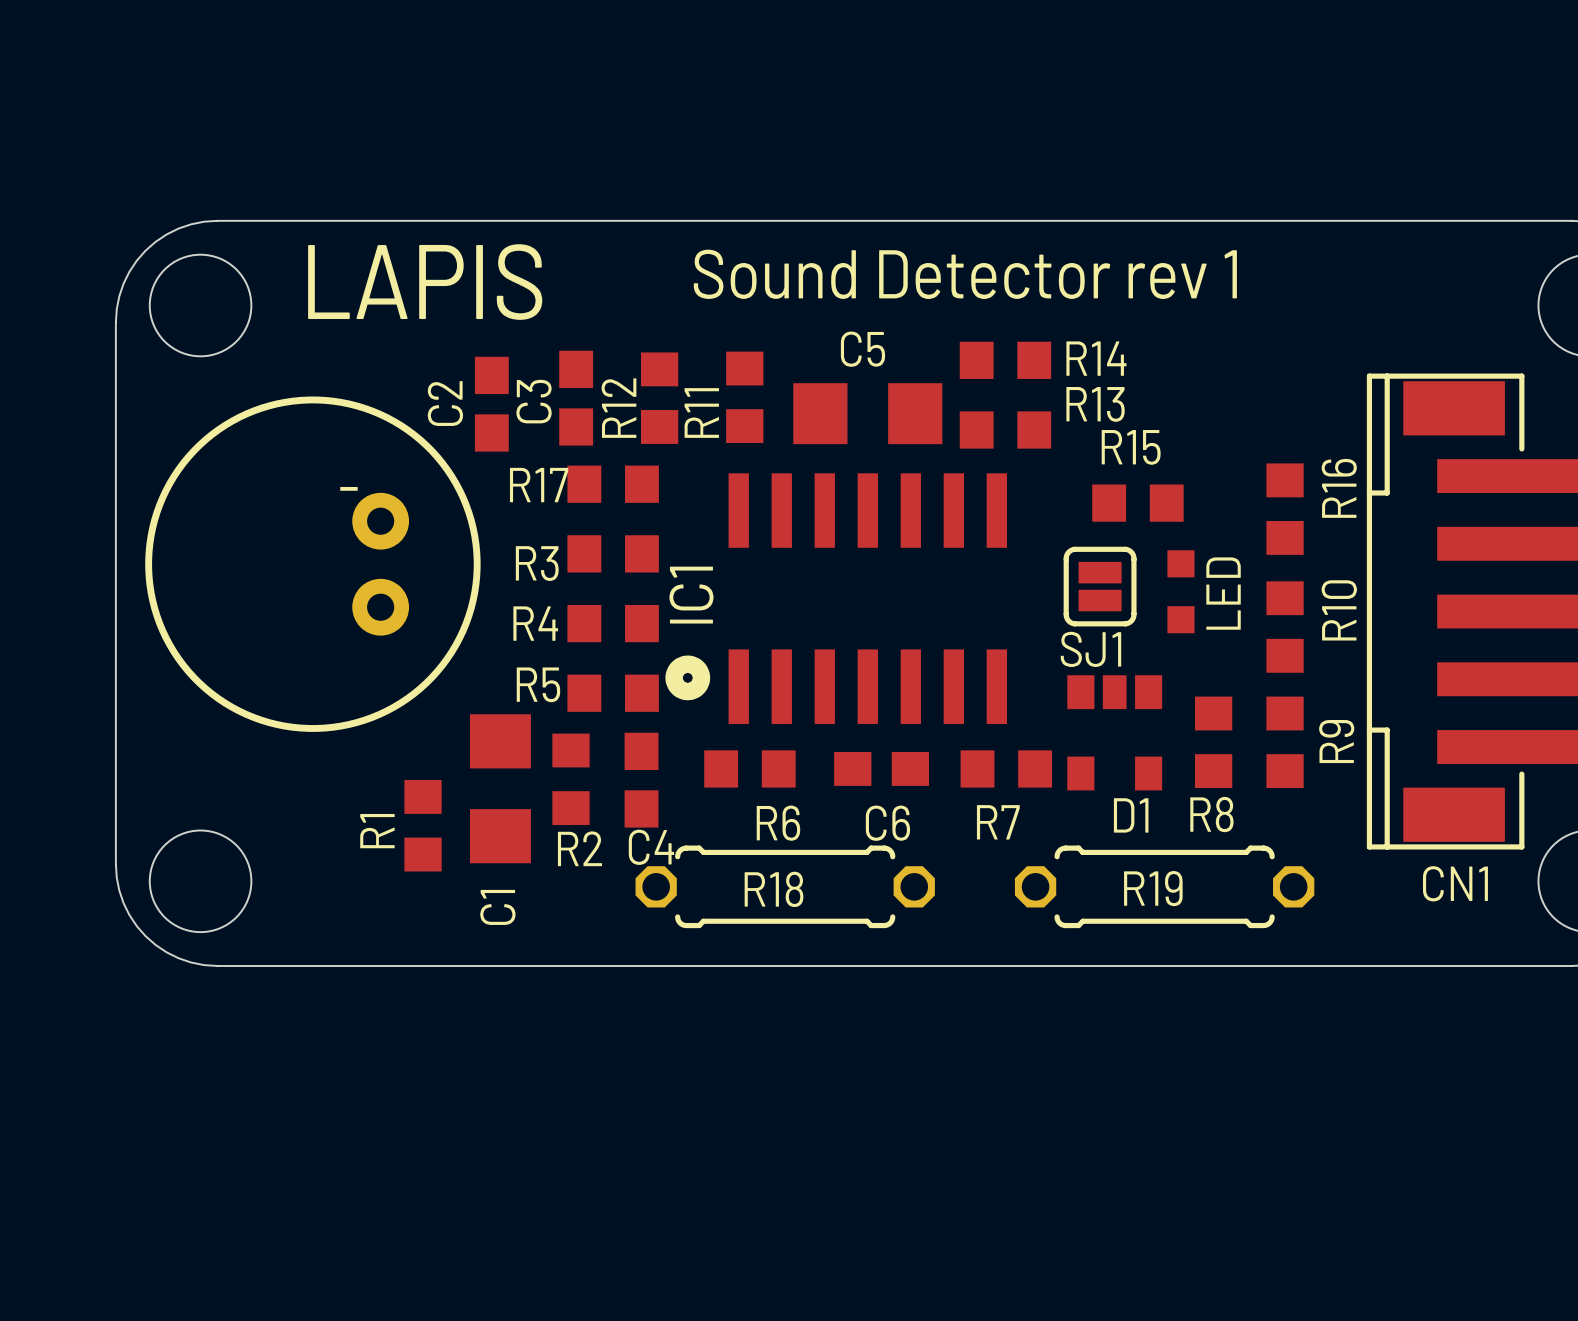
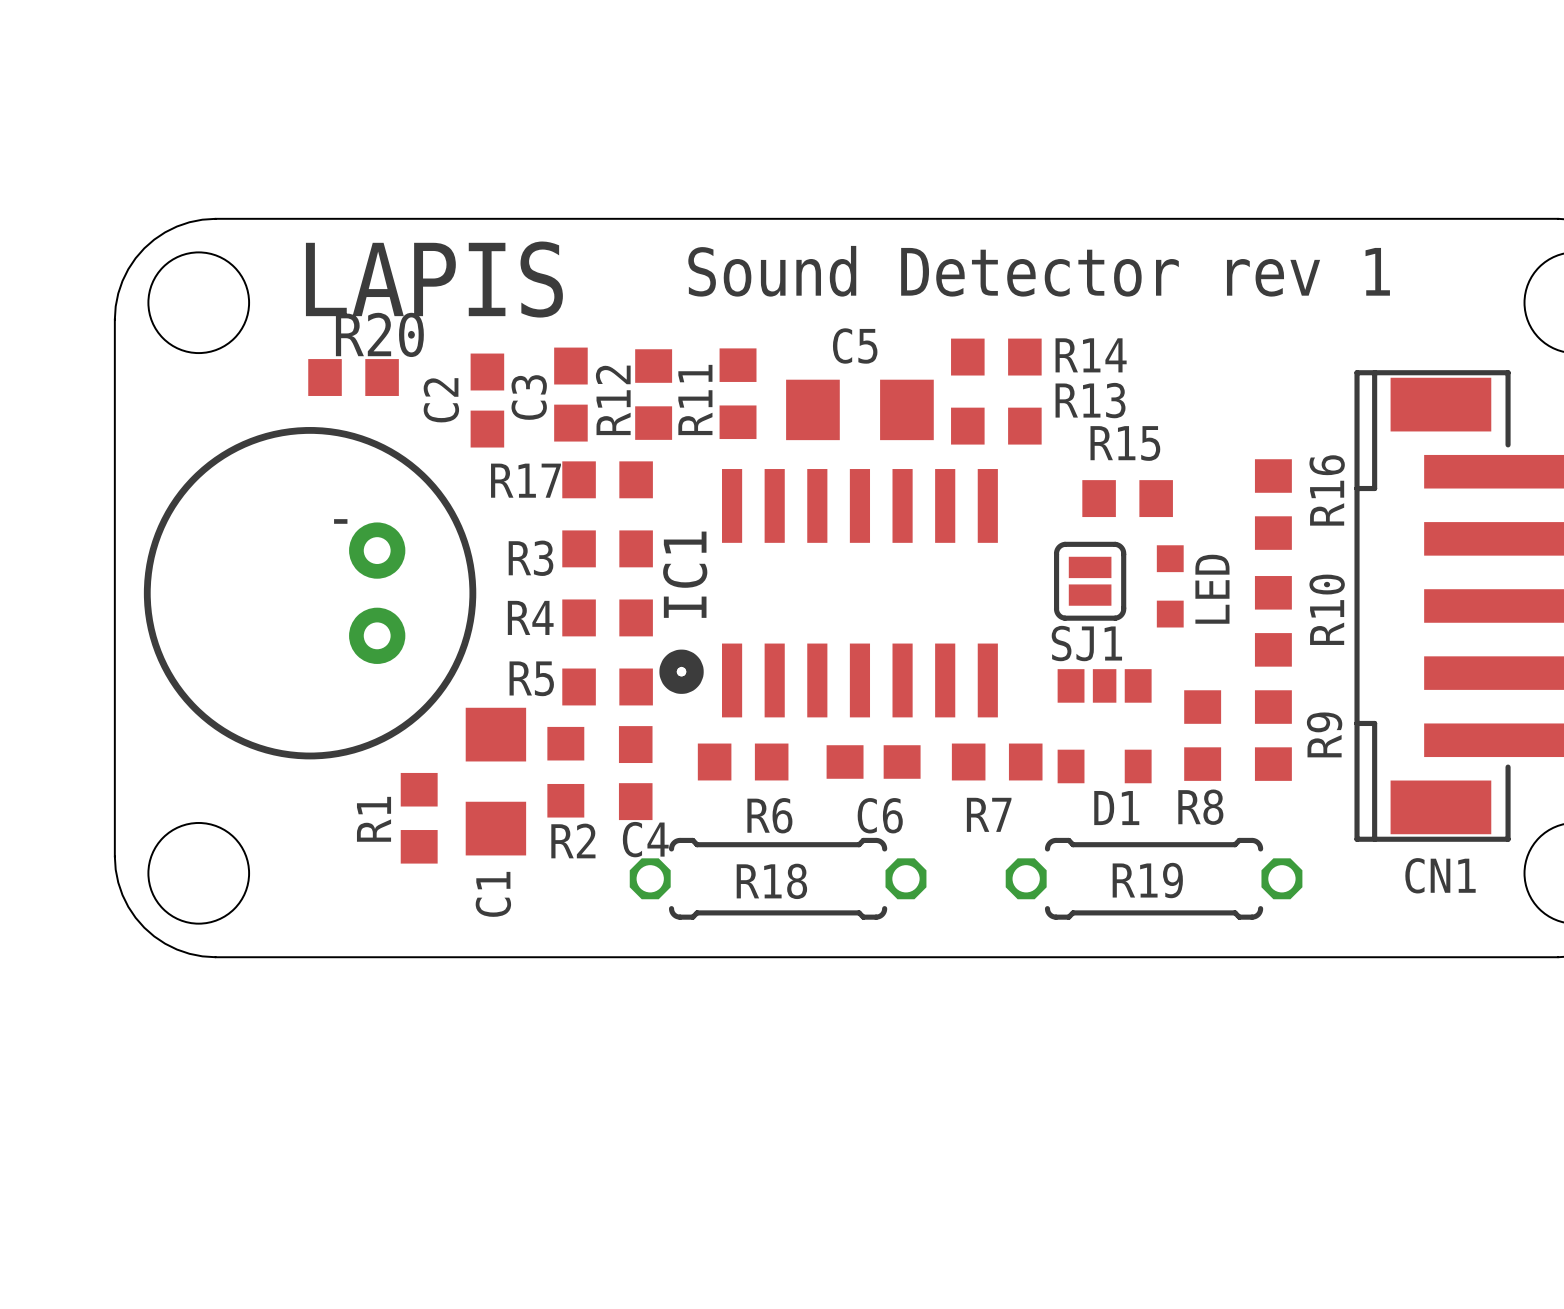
R20: none -> (353, 377)
part position: (312, 564) -> (310, 593)

